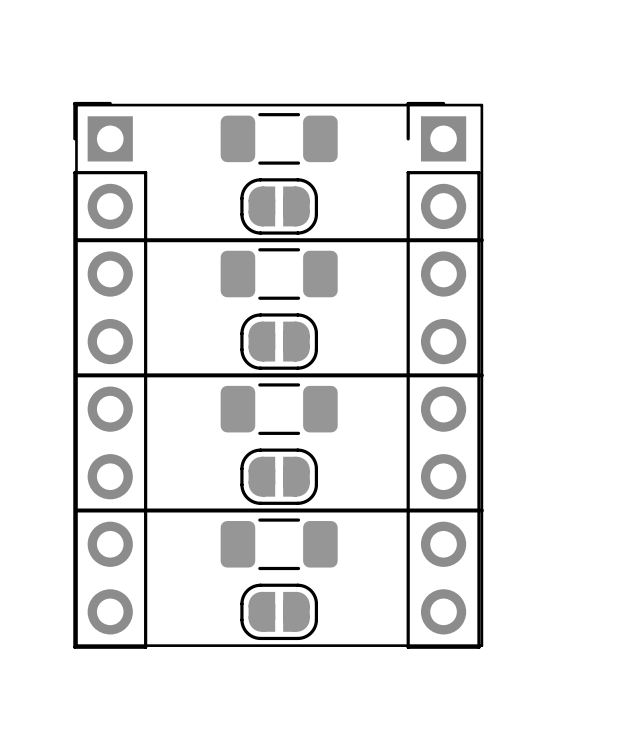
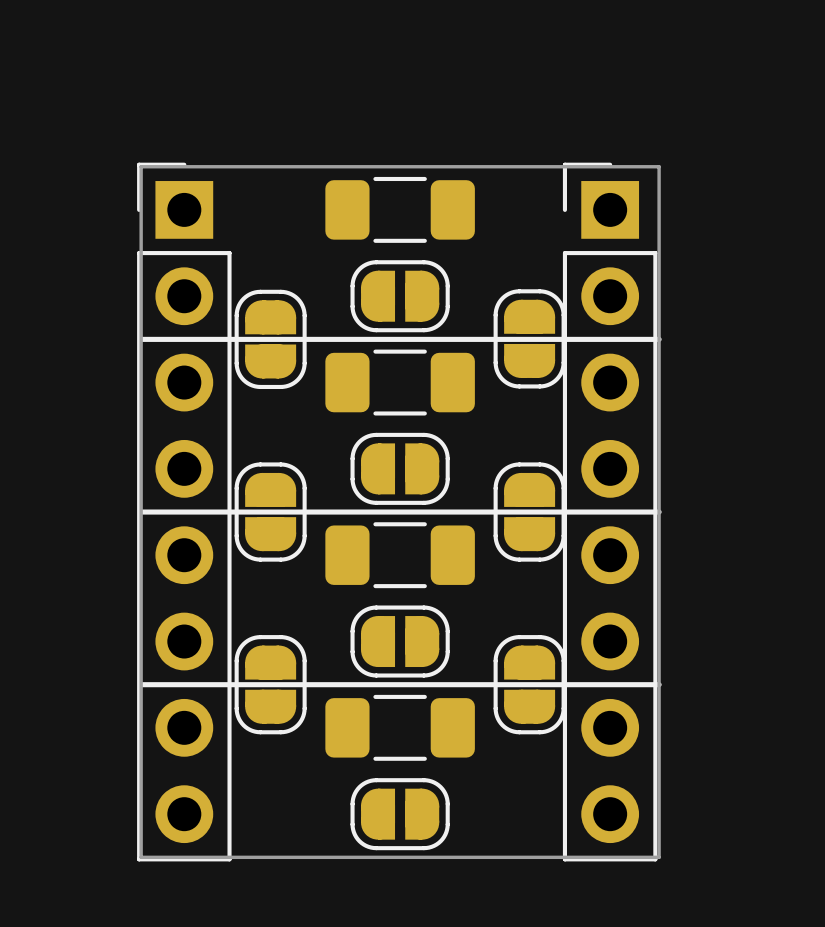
part: none -> (529, 338)
part: none -> (270, 339)
part: none -> (270, 512)
part: none -> (529, 512)
part: none -> (270, 684)
part: none -> (529, 684)

